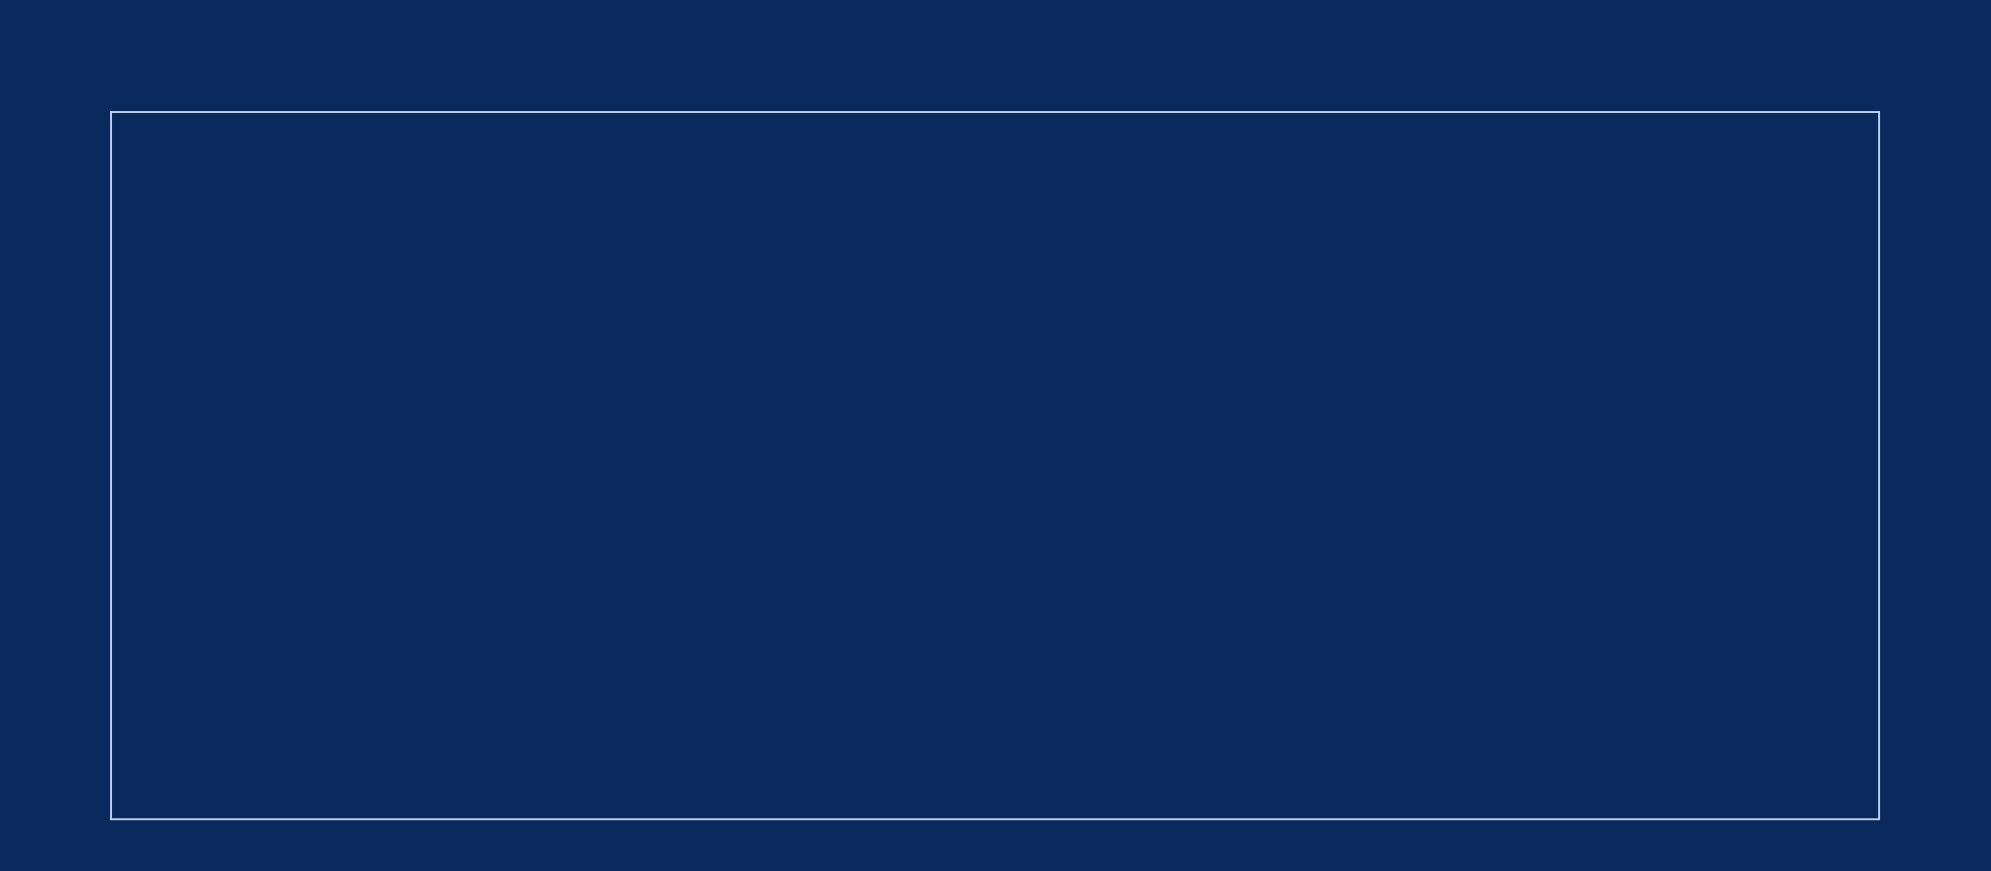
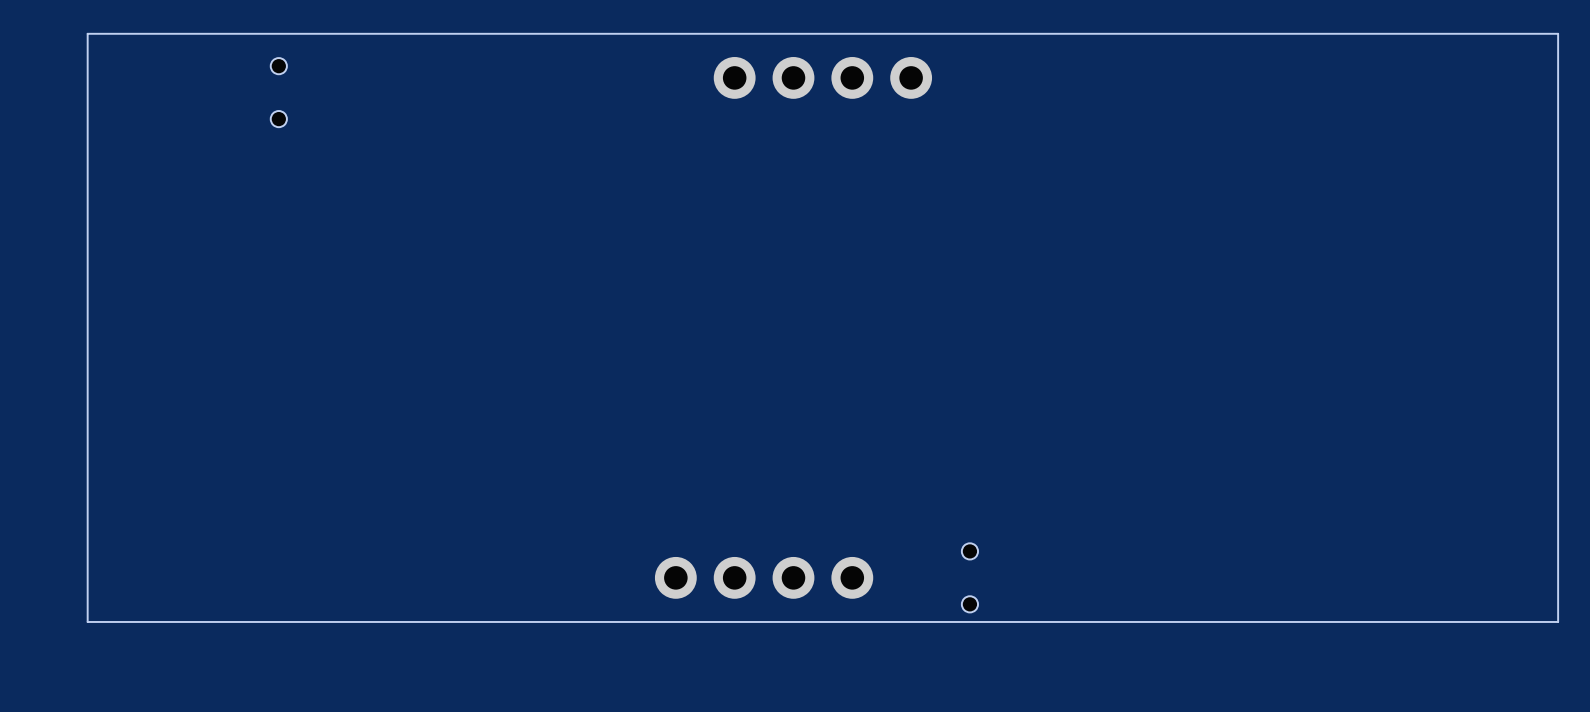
part: none -> (822, 77)
part: none -> (278, 92)
part: none -> (764, 577)
part: none -> (969, 577)

